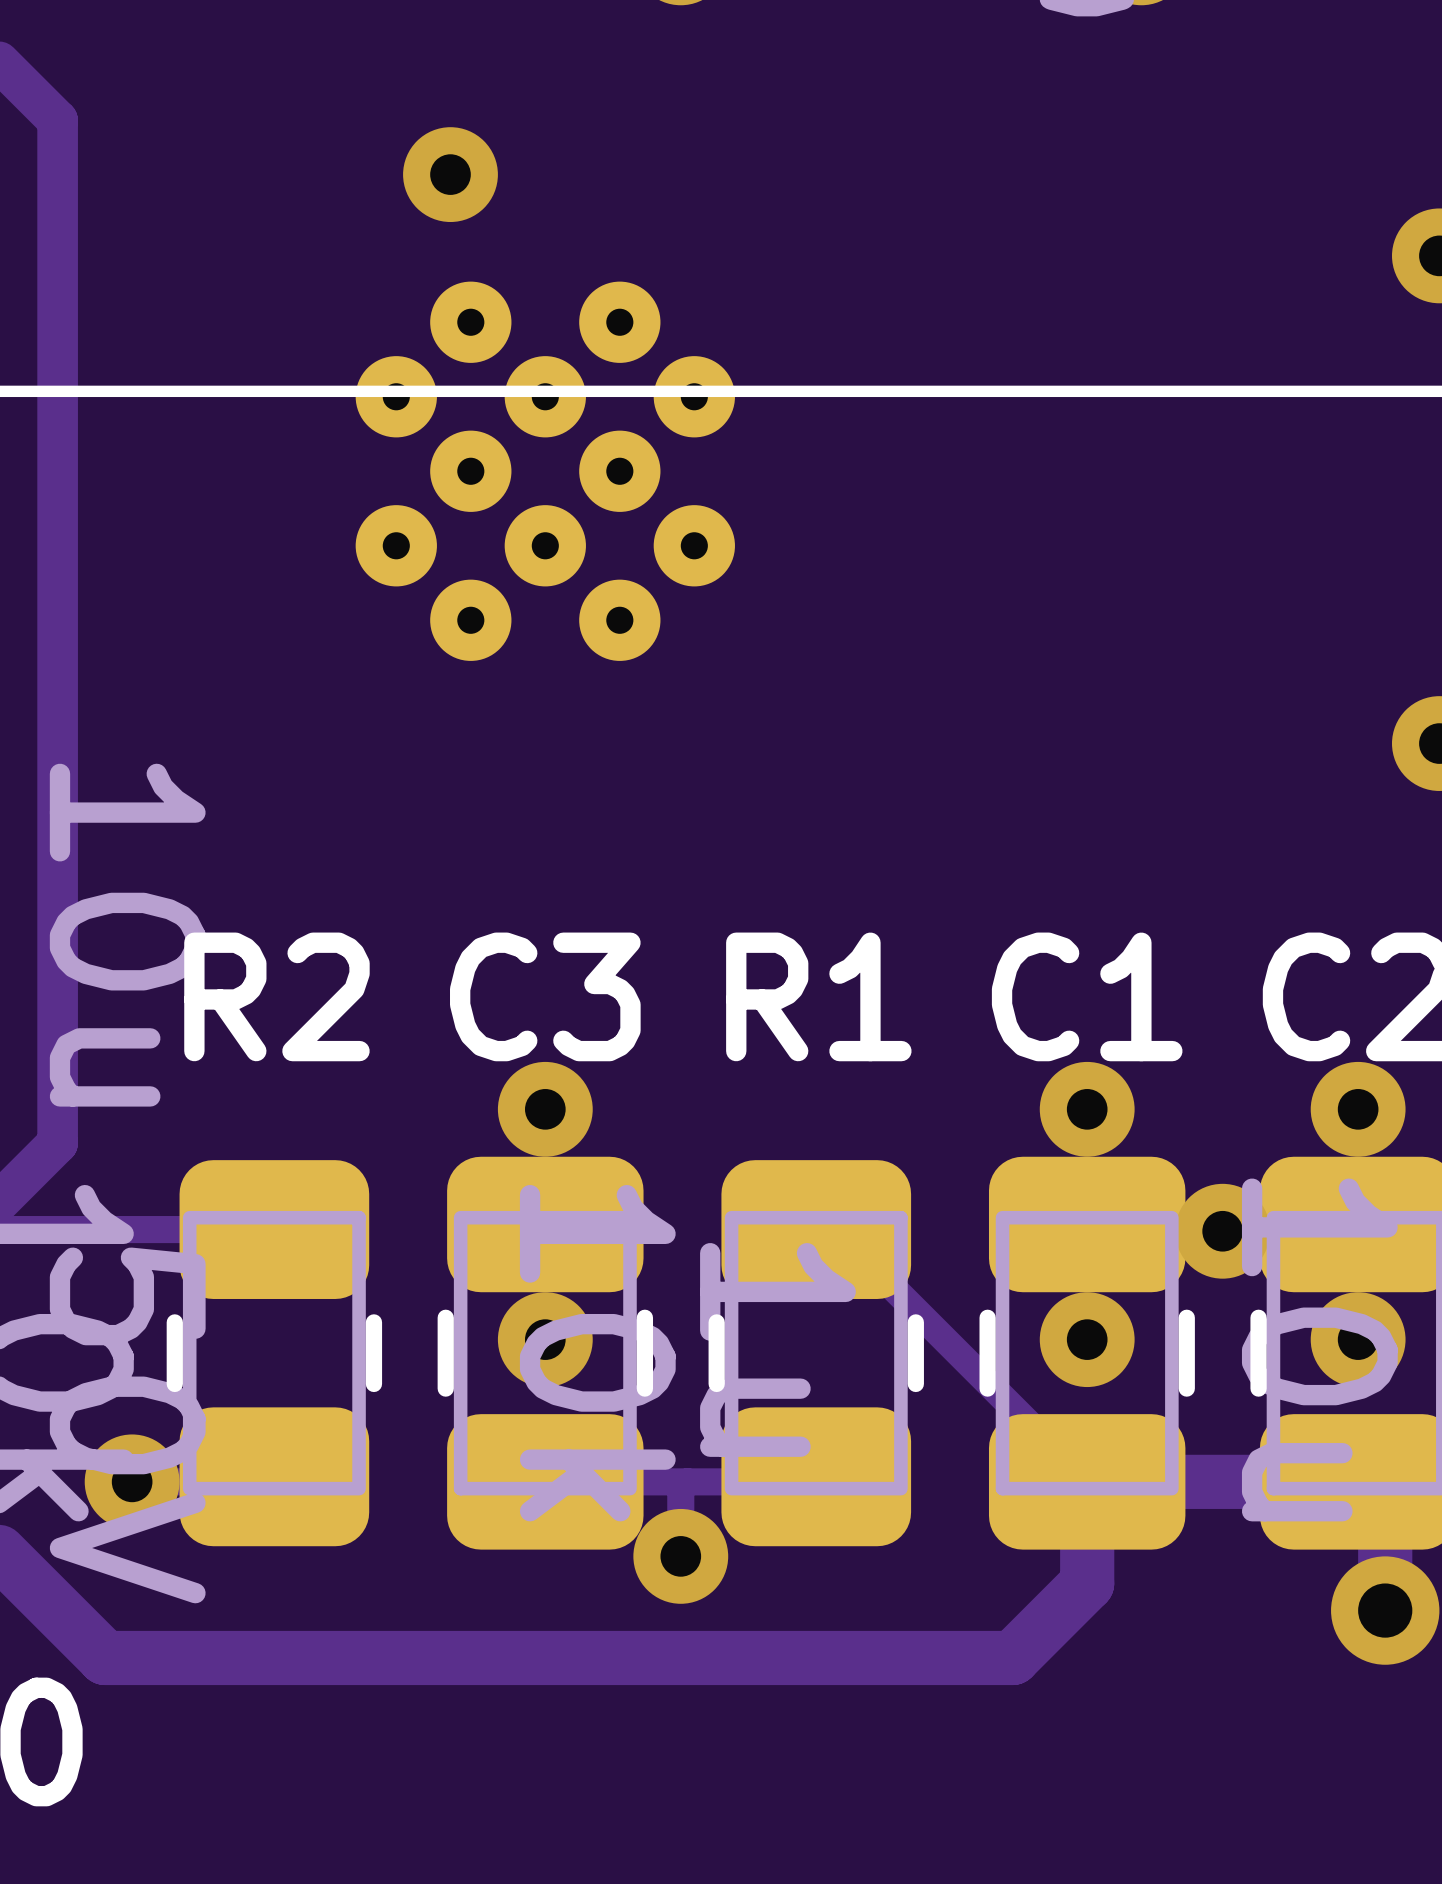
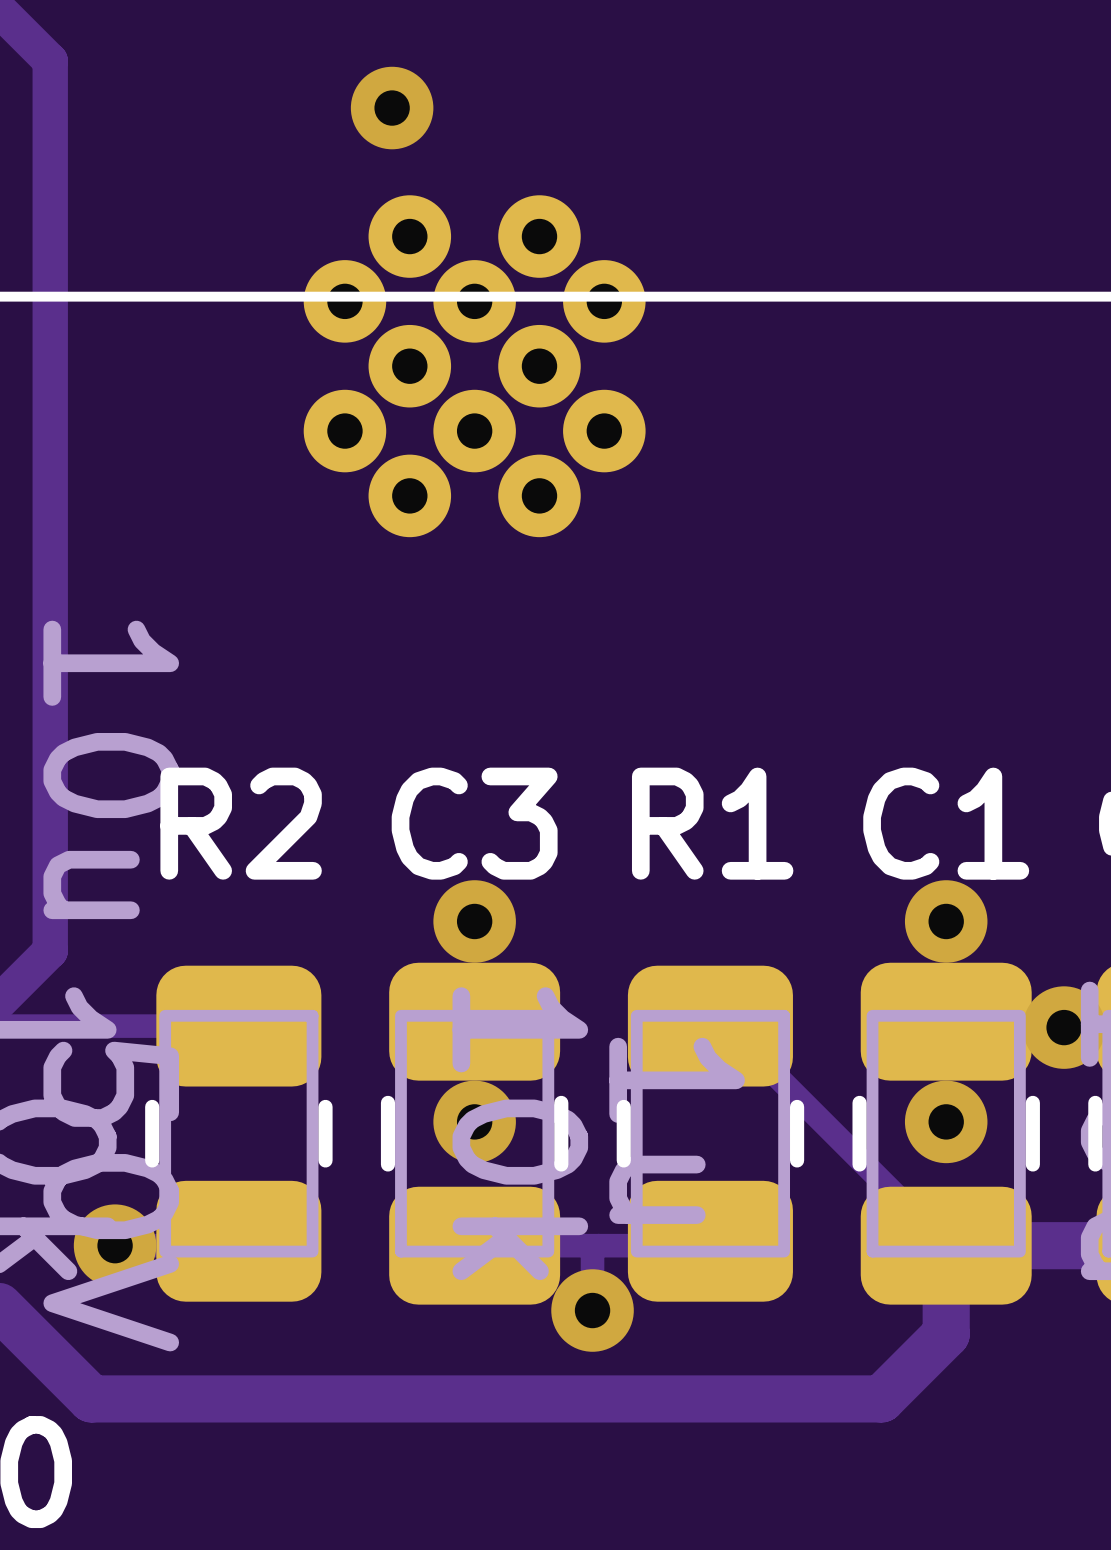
part footprint: [355, 281, 735, 661] -> [303, 195, 646, 538]

